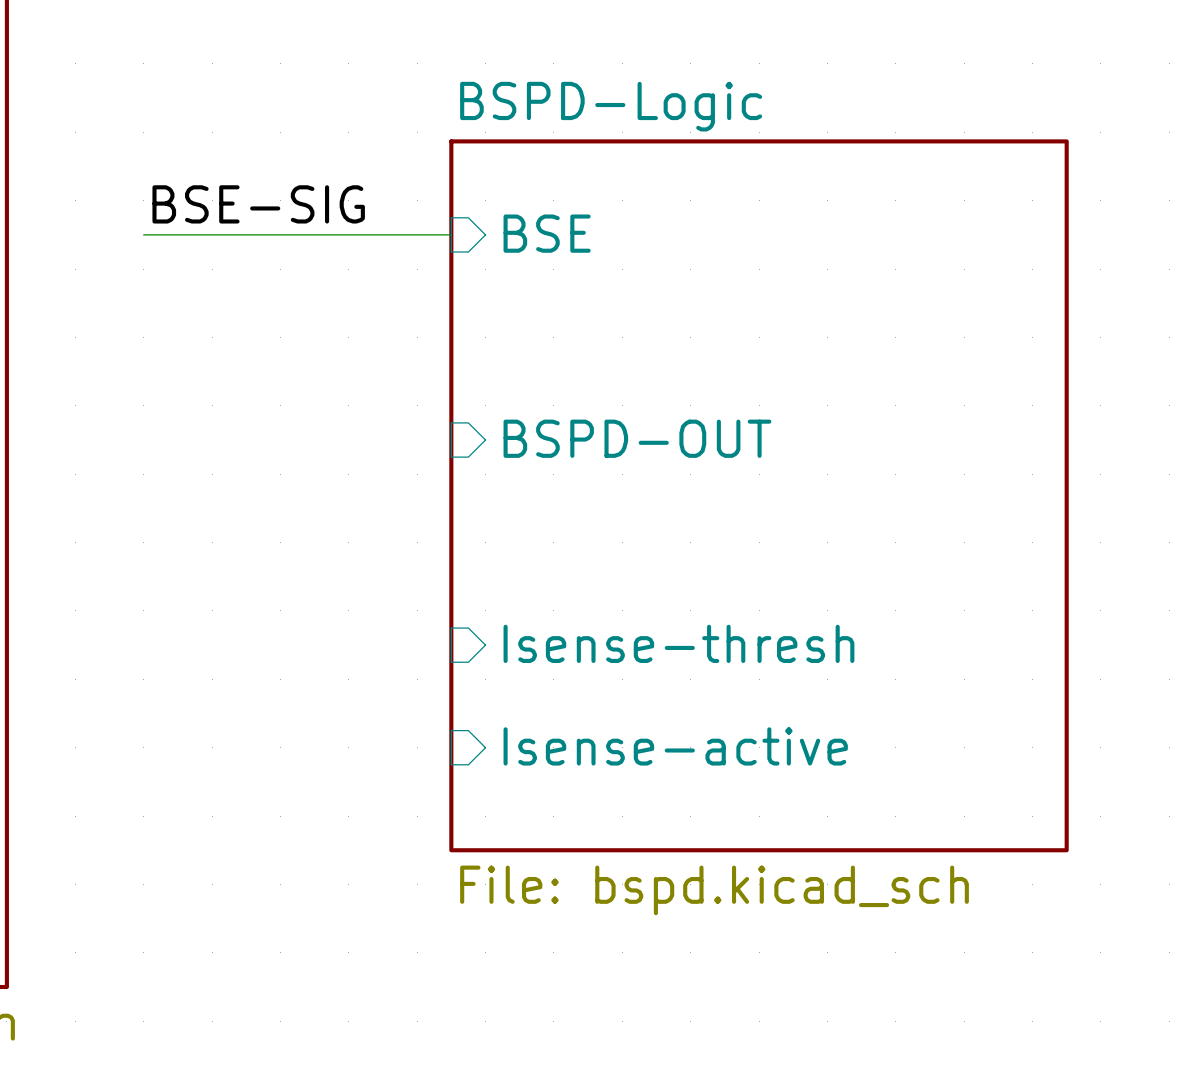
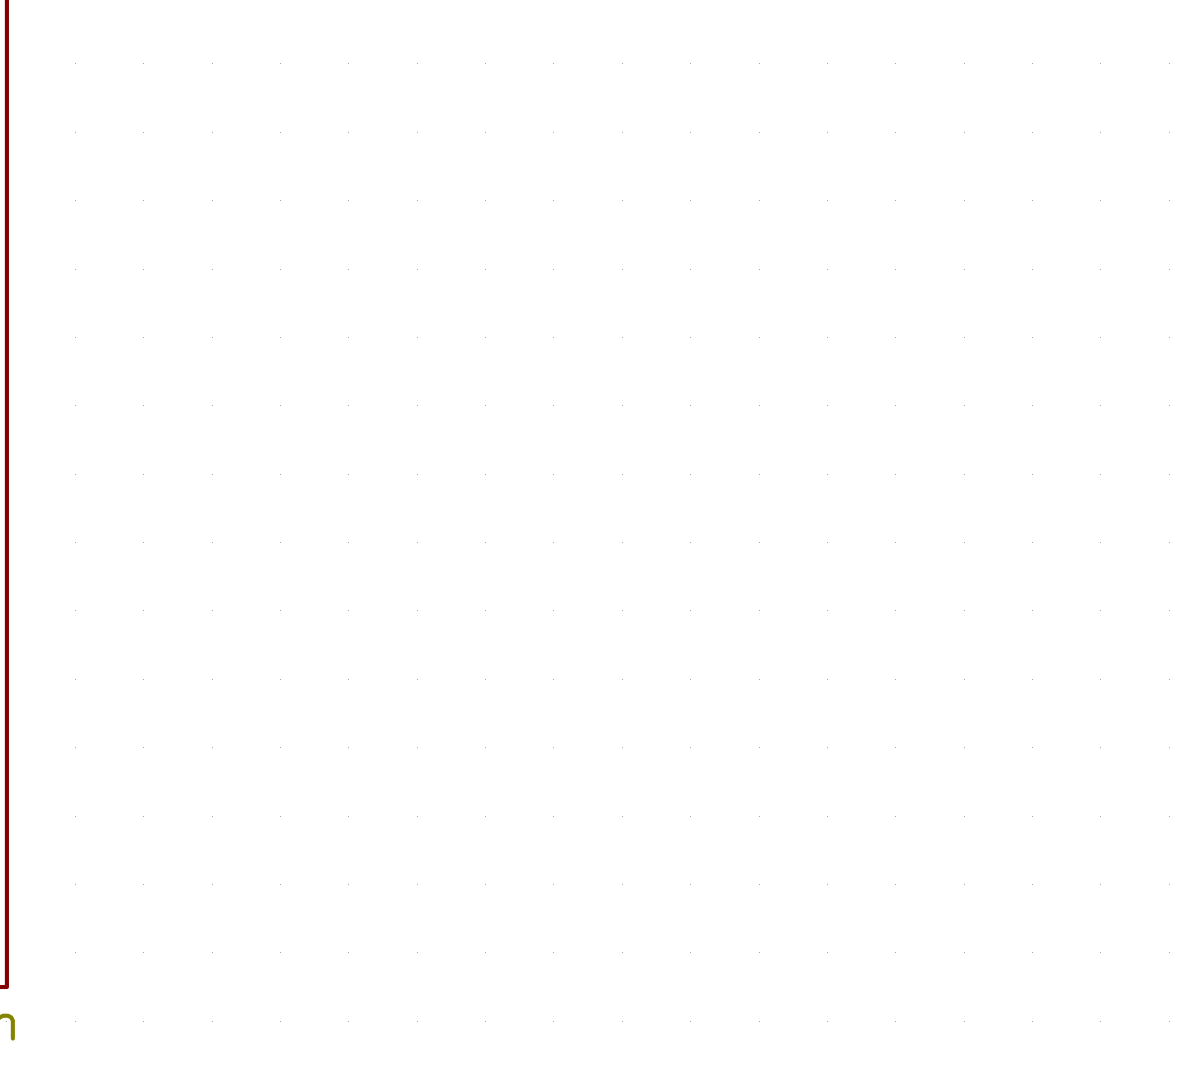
label: BSE-SIG (258, 204) -> none
sheet pin: BSE (547, 233) -> none
wire: (143, 234) (451, 234) -> none
sheet pin: BSPD-OUT (637, 438) -> none
sheet BSPD-Logic: File: bspd.kicad_sch (759, 495) -> none
sheet pin: Isense-thresh (678, 643) -> none
sheet pin: Isense-active (675, 746) -> none

